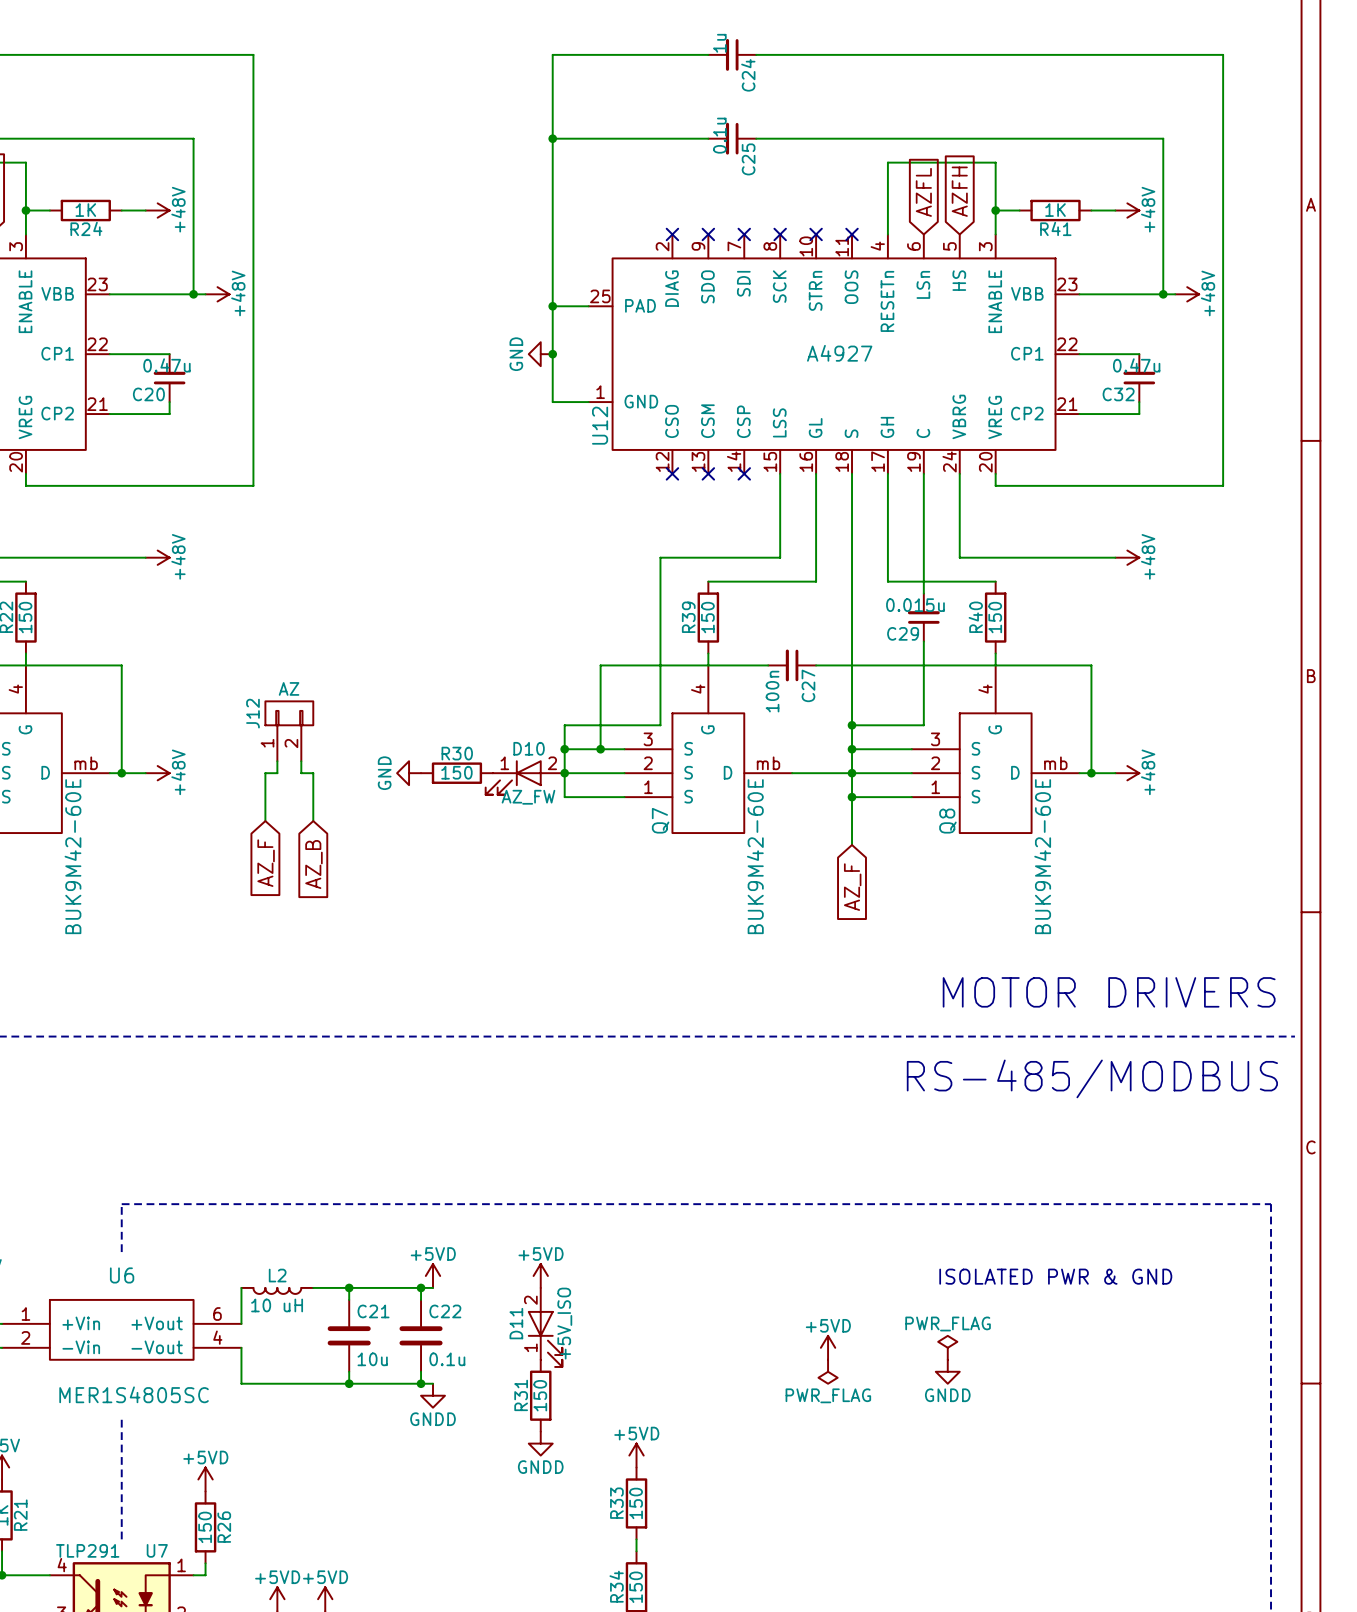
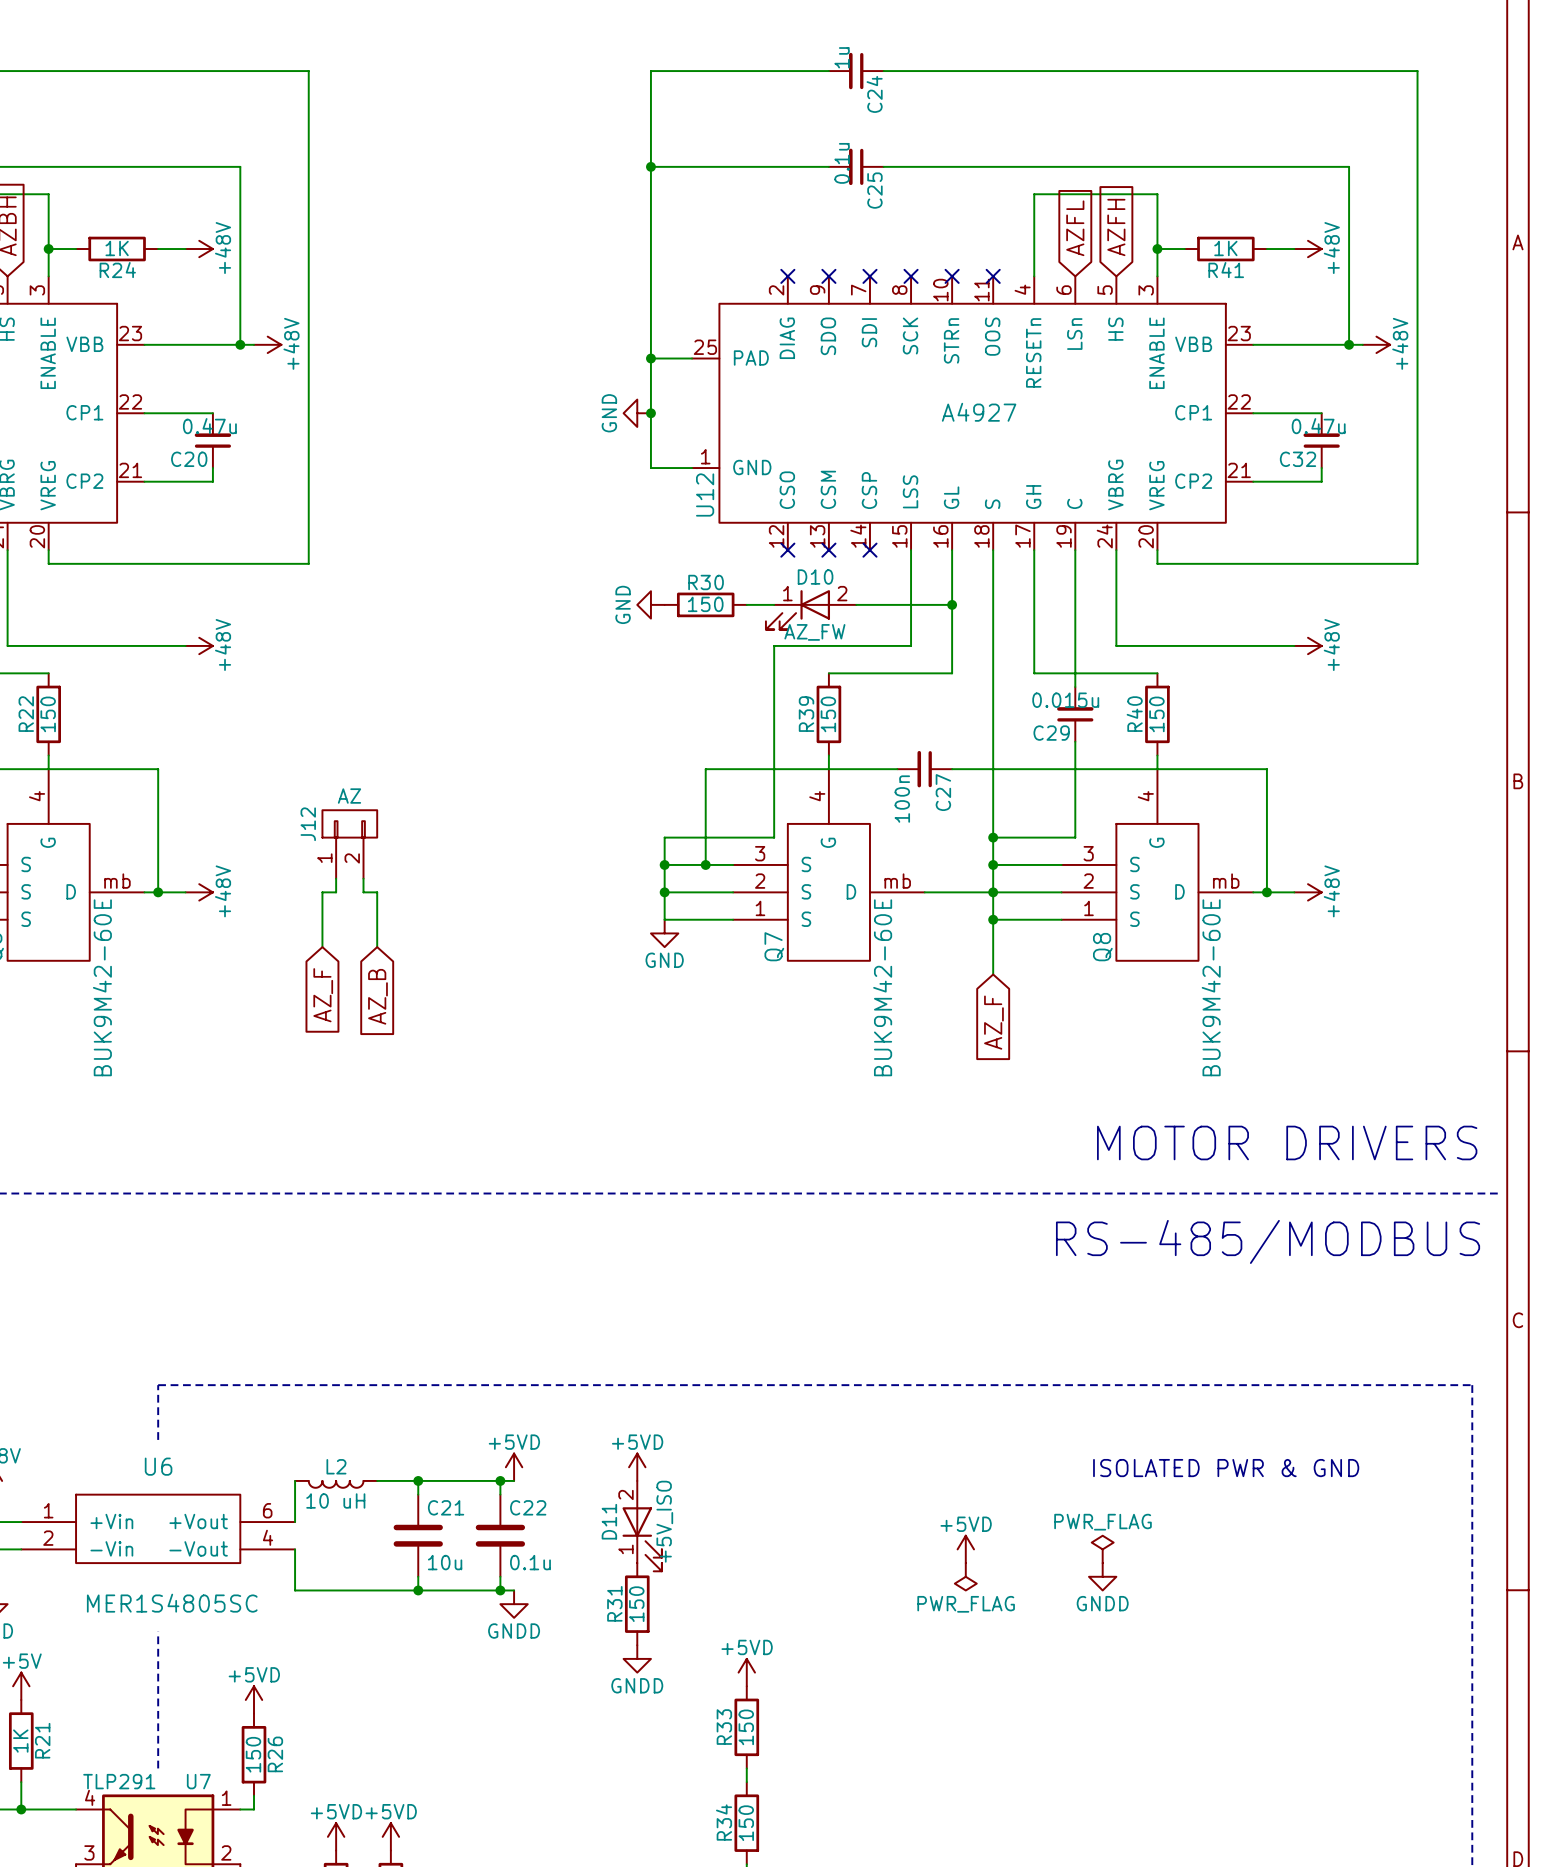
power symbol: none -> GND (650, 604)
wire: none -> (746, 604) (774, 604)
wire: none -> (856, 604) (952, 604)
junction: none -> (952, 604)
power symbol: GND (409, 773) -> none
R30 position: (456, 773) -> (705, 604)
D10 position: (525, 777) -> (811, 609)
power symbol: none -> GND (664, 933)

